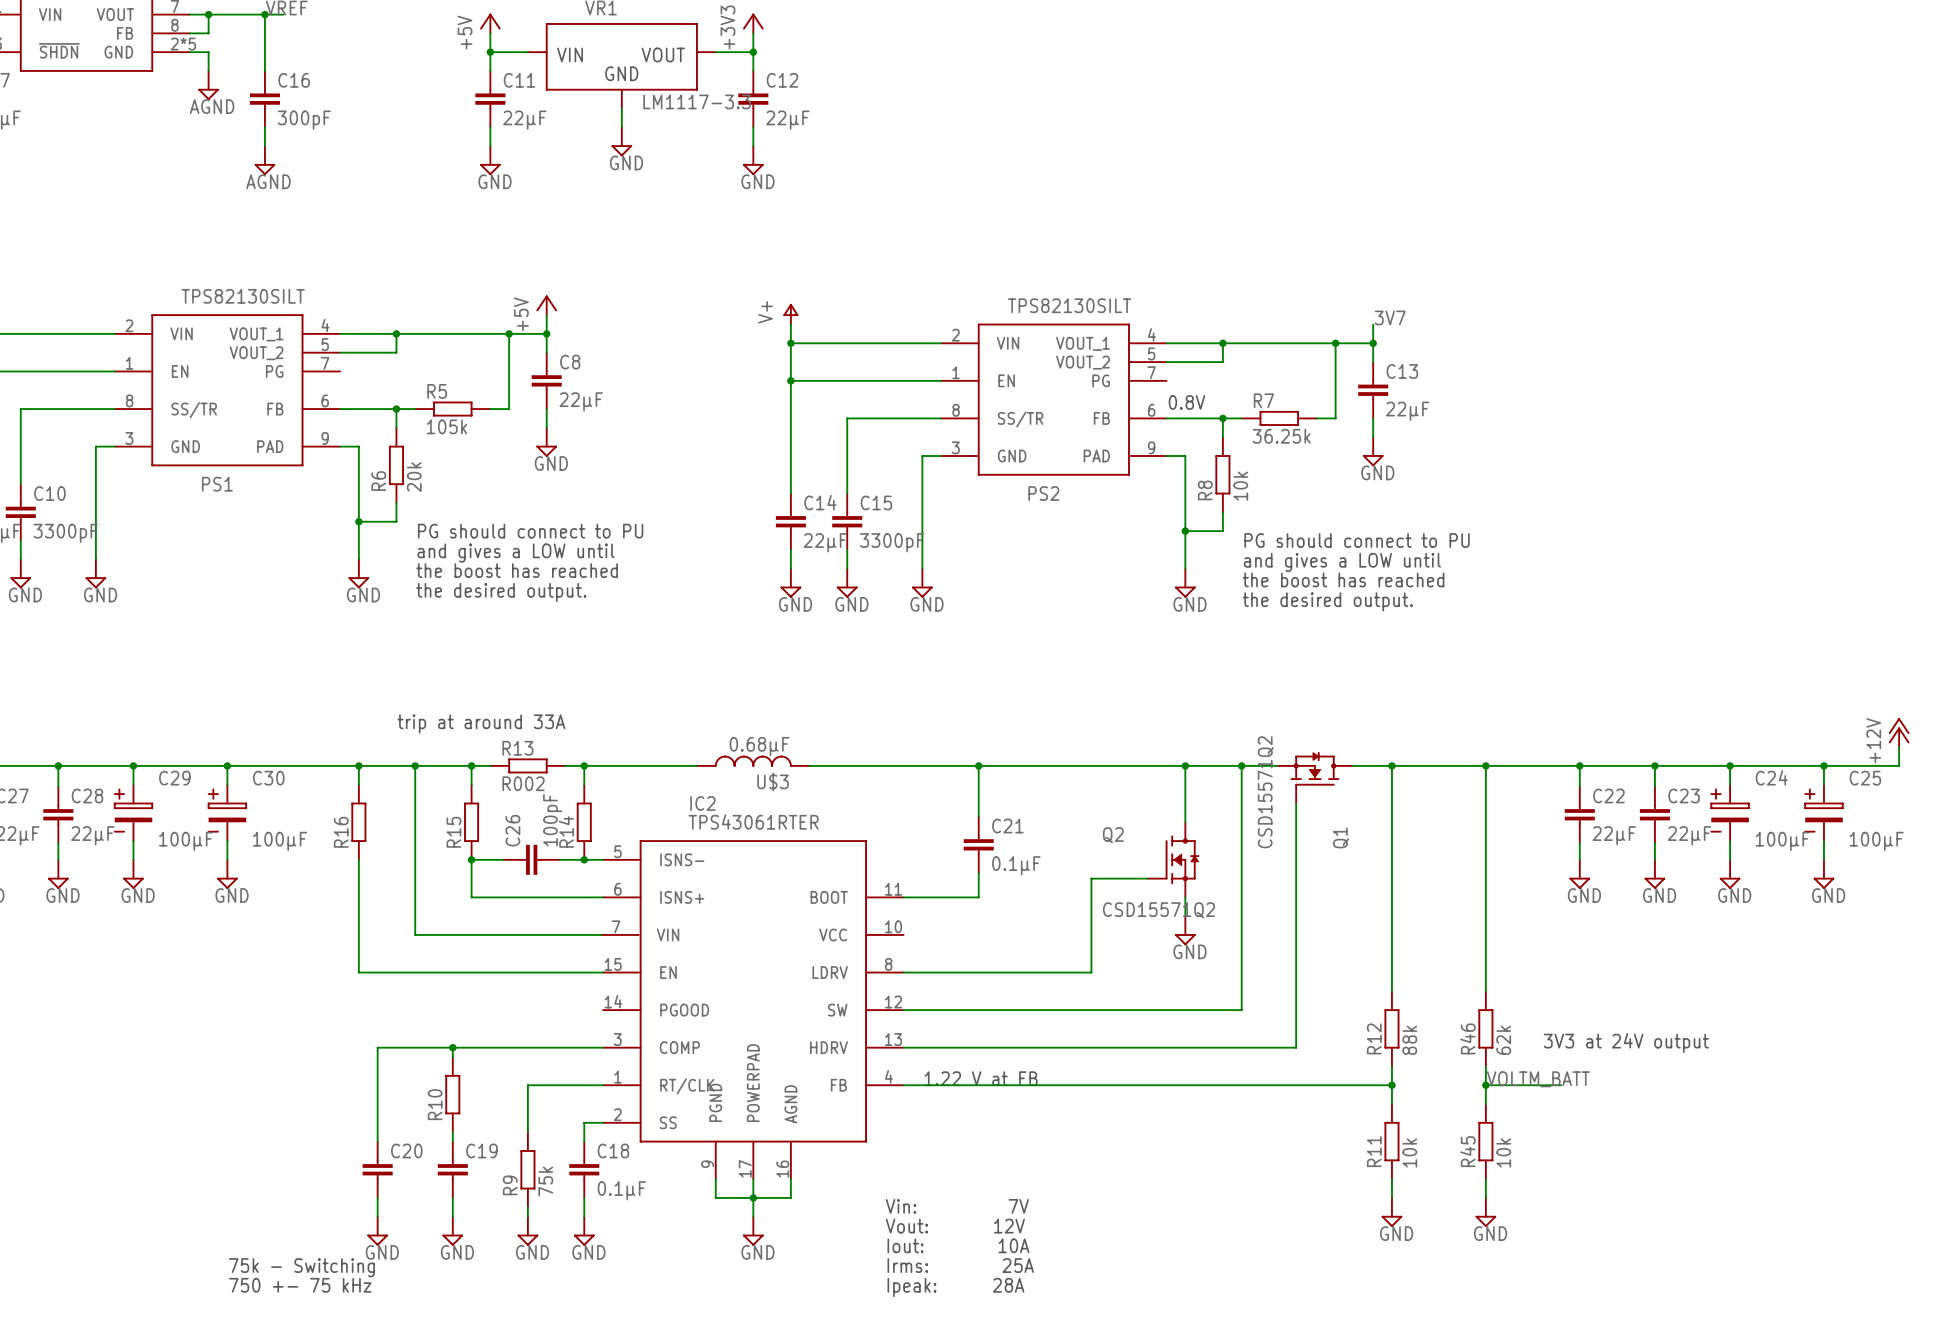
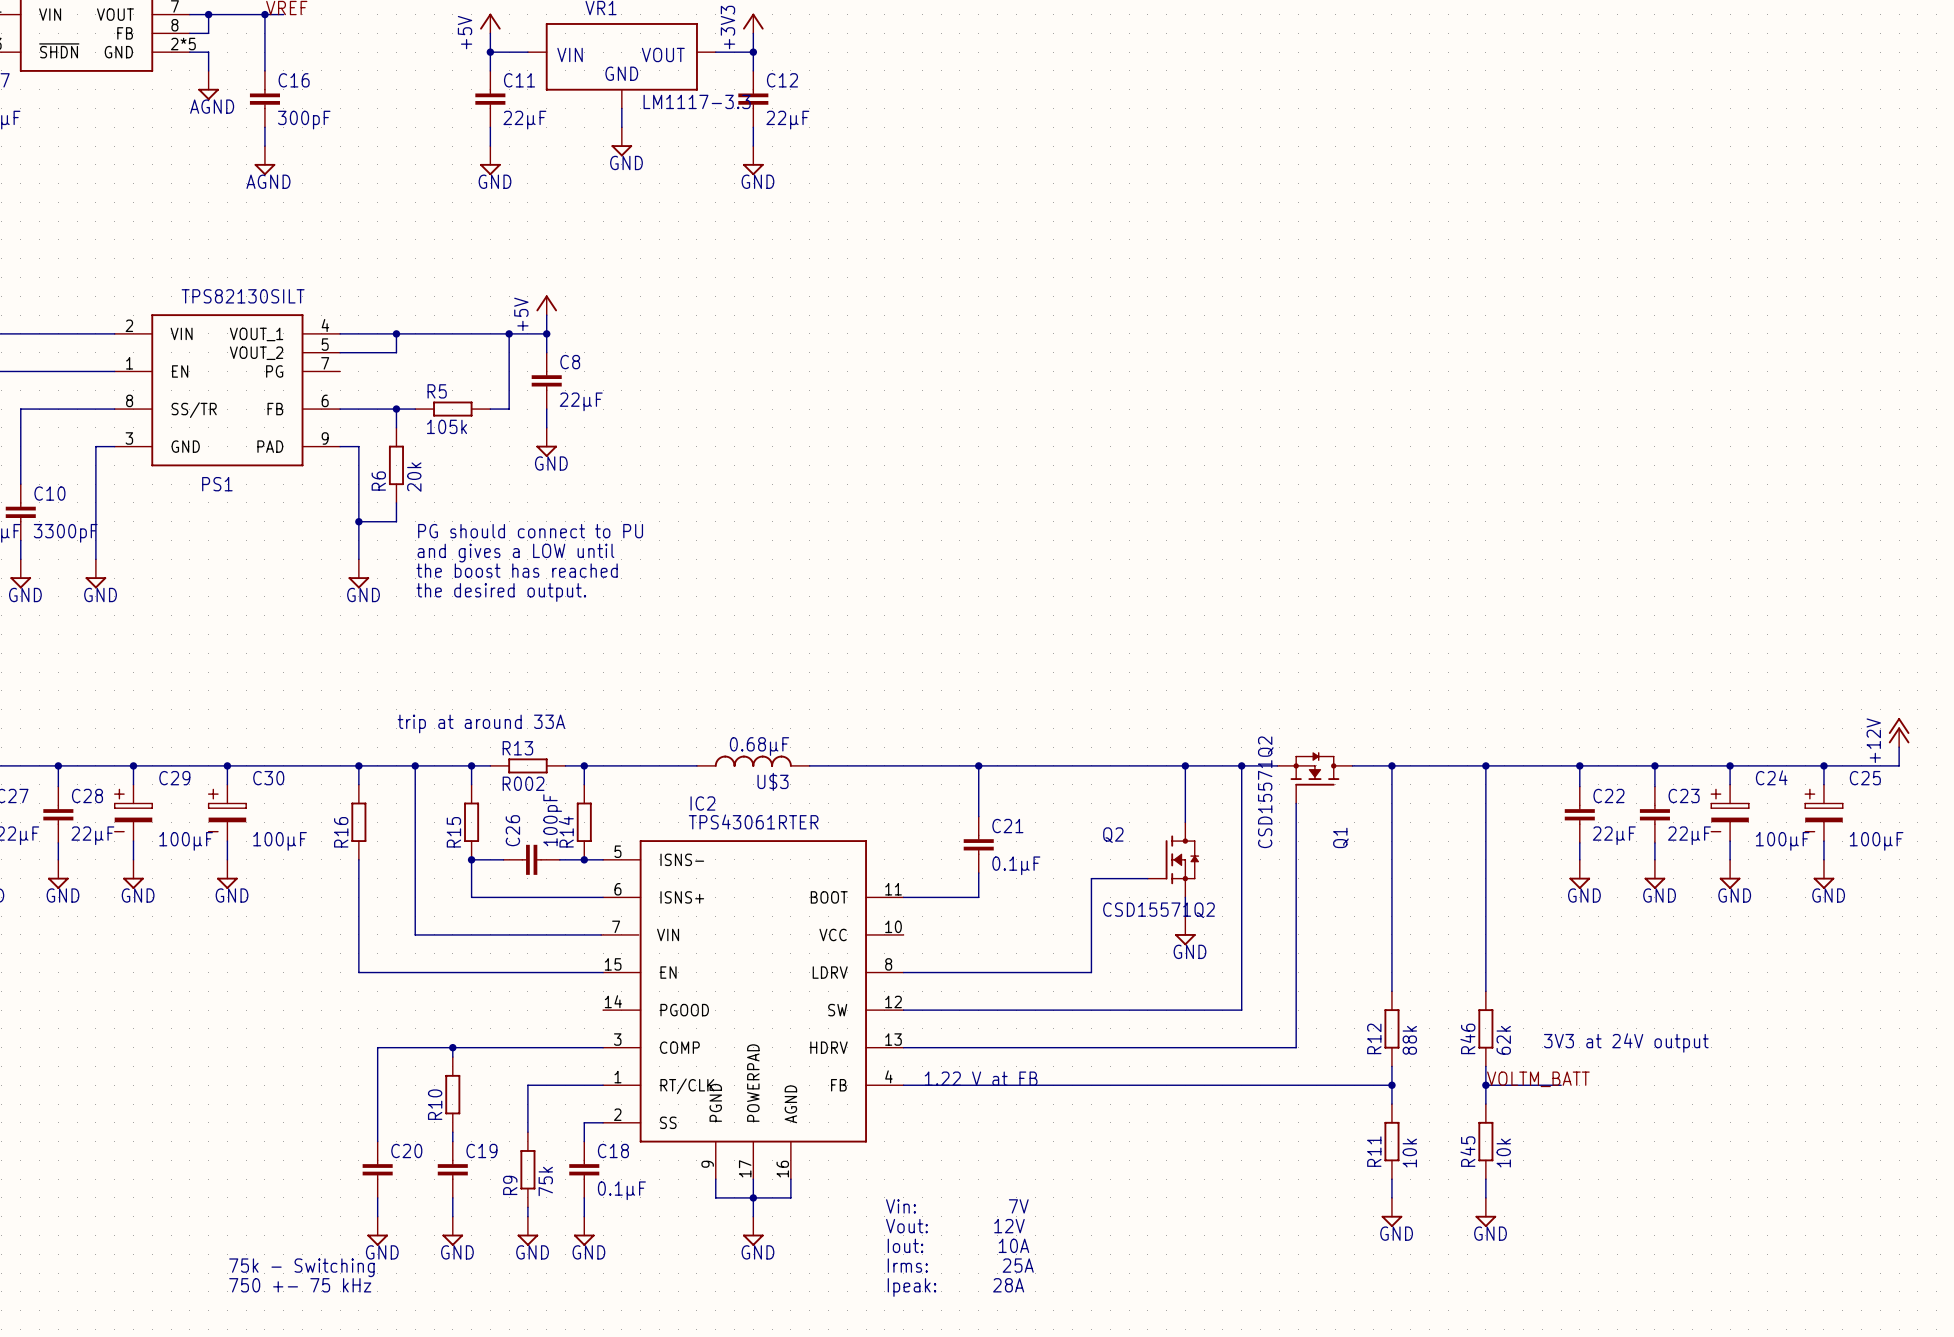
power symbol: V+ (790, 314) -> none
label: 3V7 (1390, 317) -> none
wire: (790, 324) (790, 493) -> none
wire: (1373, 324) (1373, 362) -> none
wire: (790, 343) (941, 343) -> none
junction: (790, 343) -> none
wire: (1166, 343) (1373, 343) -> none
wire: (1222, 343) (1222, 362) (1166, 362) -> none
junction: (1222, 343) -> none
wire: (1335, 343) (1335, 418) (1316, 418) -> none
junction: (1335, 343) -> none
junction: (1373, 343) -> none
wire: (790, 380) (941, 380) -> none
junction: (790, 380) -> none
C13: 22µF (1373, 390) -> none
PS2: TPS82130SILT (1053, 399) -> none
text: 0.8V (1186, 402) -> none
wire: (941, 418) (847, 418) (847, 493) -> none
wire: (1166, 418) (1241, 418) -> none
wire: (1222, 418) (1222, 437) -> none
junction: (1222, 418) -> none
R7: 36.25k (1279, 418) -> none
wire: (1373, 418) (1373, 437) -> none
power symbol: GND (1373, 451) -> none
wire: (941, 456) (922, 456) (922, 568) -> none
wire: (1166, 456) (1185, 456) (1185, 568) -> none
R8: 10k (1222, 474) -> none
wire: (1222, 512) (1222, 531) (1185, 531) -> none
C14: 22µF (790, 521) -> none
C15: 3300pF (847, 521) -> none
junction: (1185, 531) -> none
text: PG should connect to PU (1357, 540) -> none
wire: (790, 549) (790, 568) -> none
wire: (847, 549) (847, 568) -> none
text: and gives a LOW until (1342, 562) -> none
text: the boost has reached (1343, 579) -> none
power symbol: GND (790, 583) -> none
power symbol: GND (847, 583) -> none
power symbol: GND (922, 583) -> none
power symbol: GND (1185, 583) -> none
text: the desired output. (1327, 601) -> none

